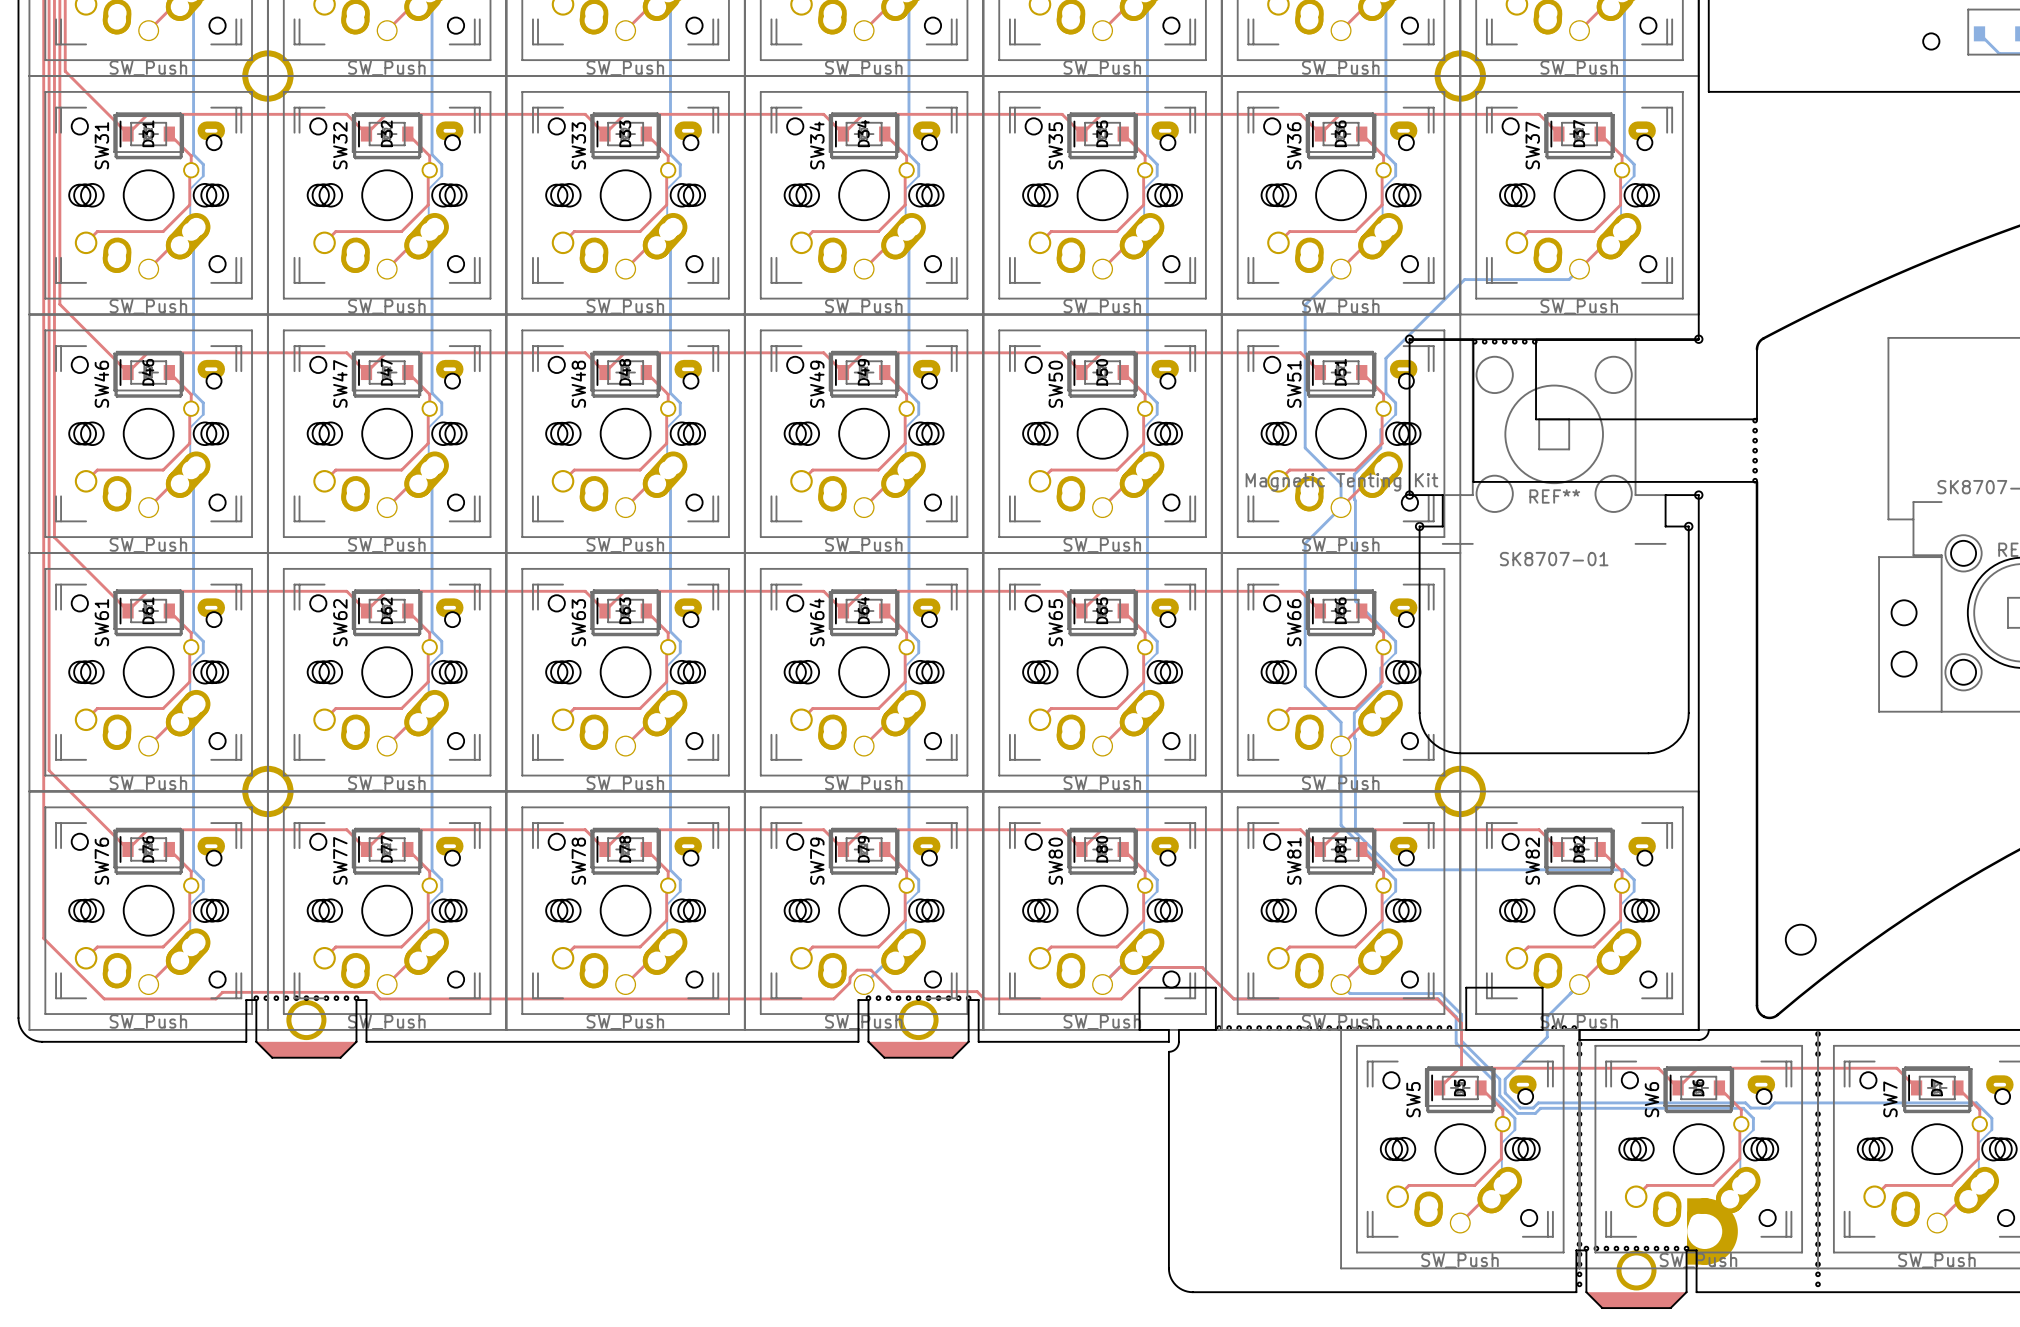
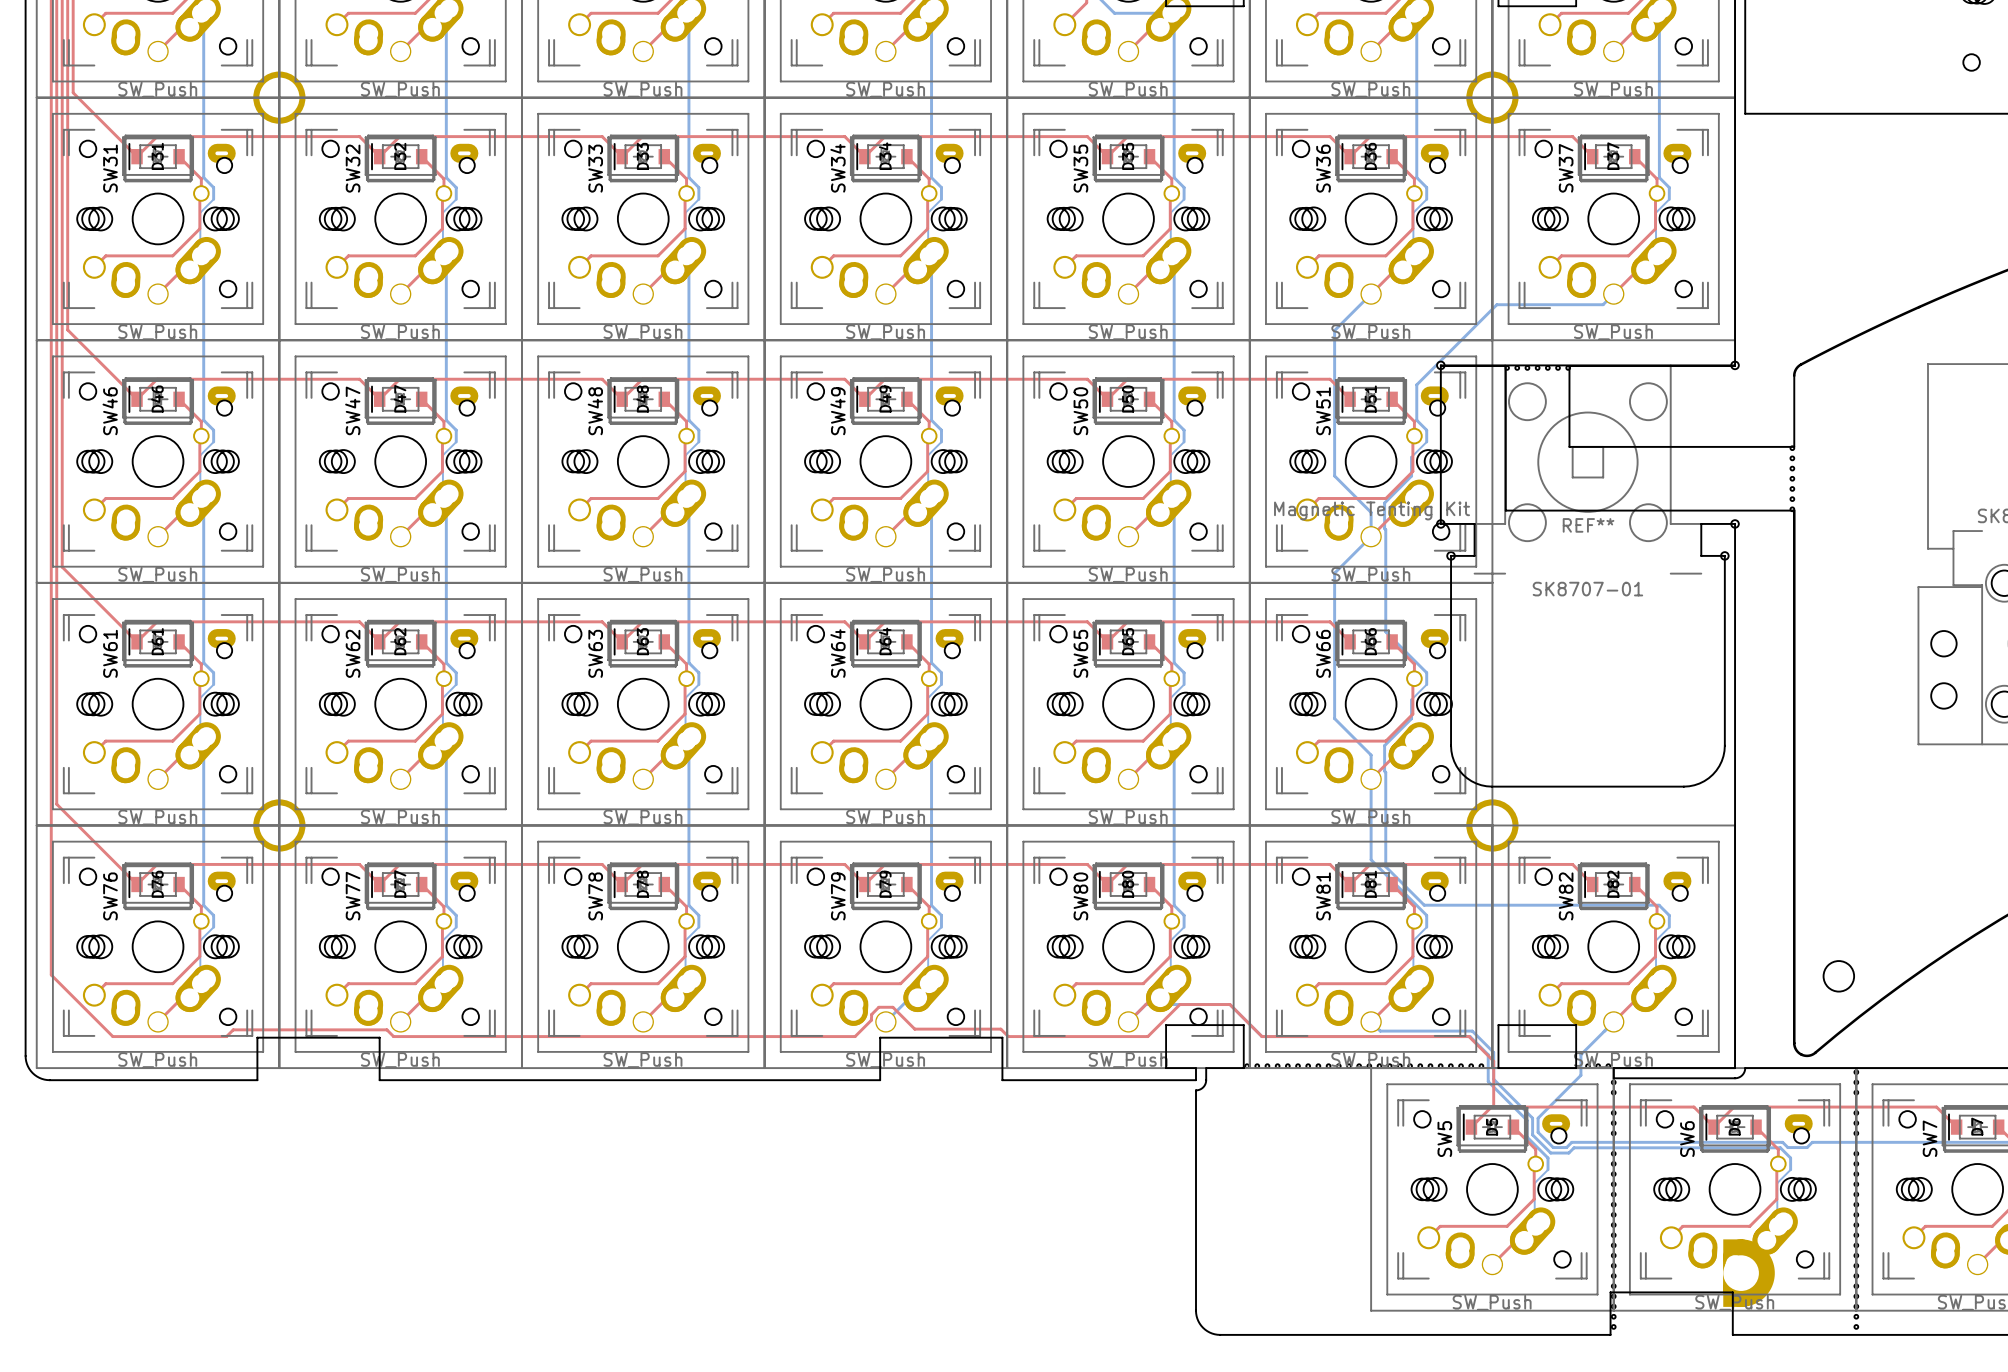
drawing: none -> [256, 1036, 381, 1082]
drawing: none -> [879, 1036, 1004, 1082]
part: (306, 1027) -> none
part: (918, 1027) -> none
drawing: none -> [1609, 1291, 1734, 1336]
part: (1636, 1277) -> none

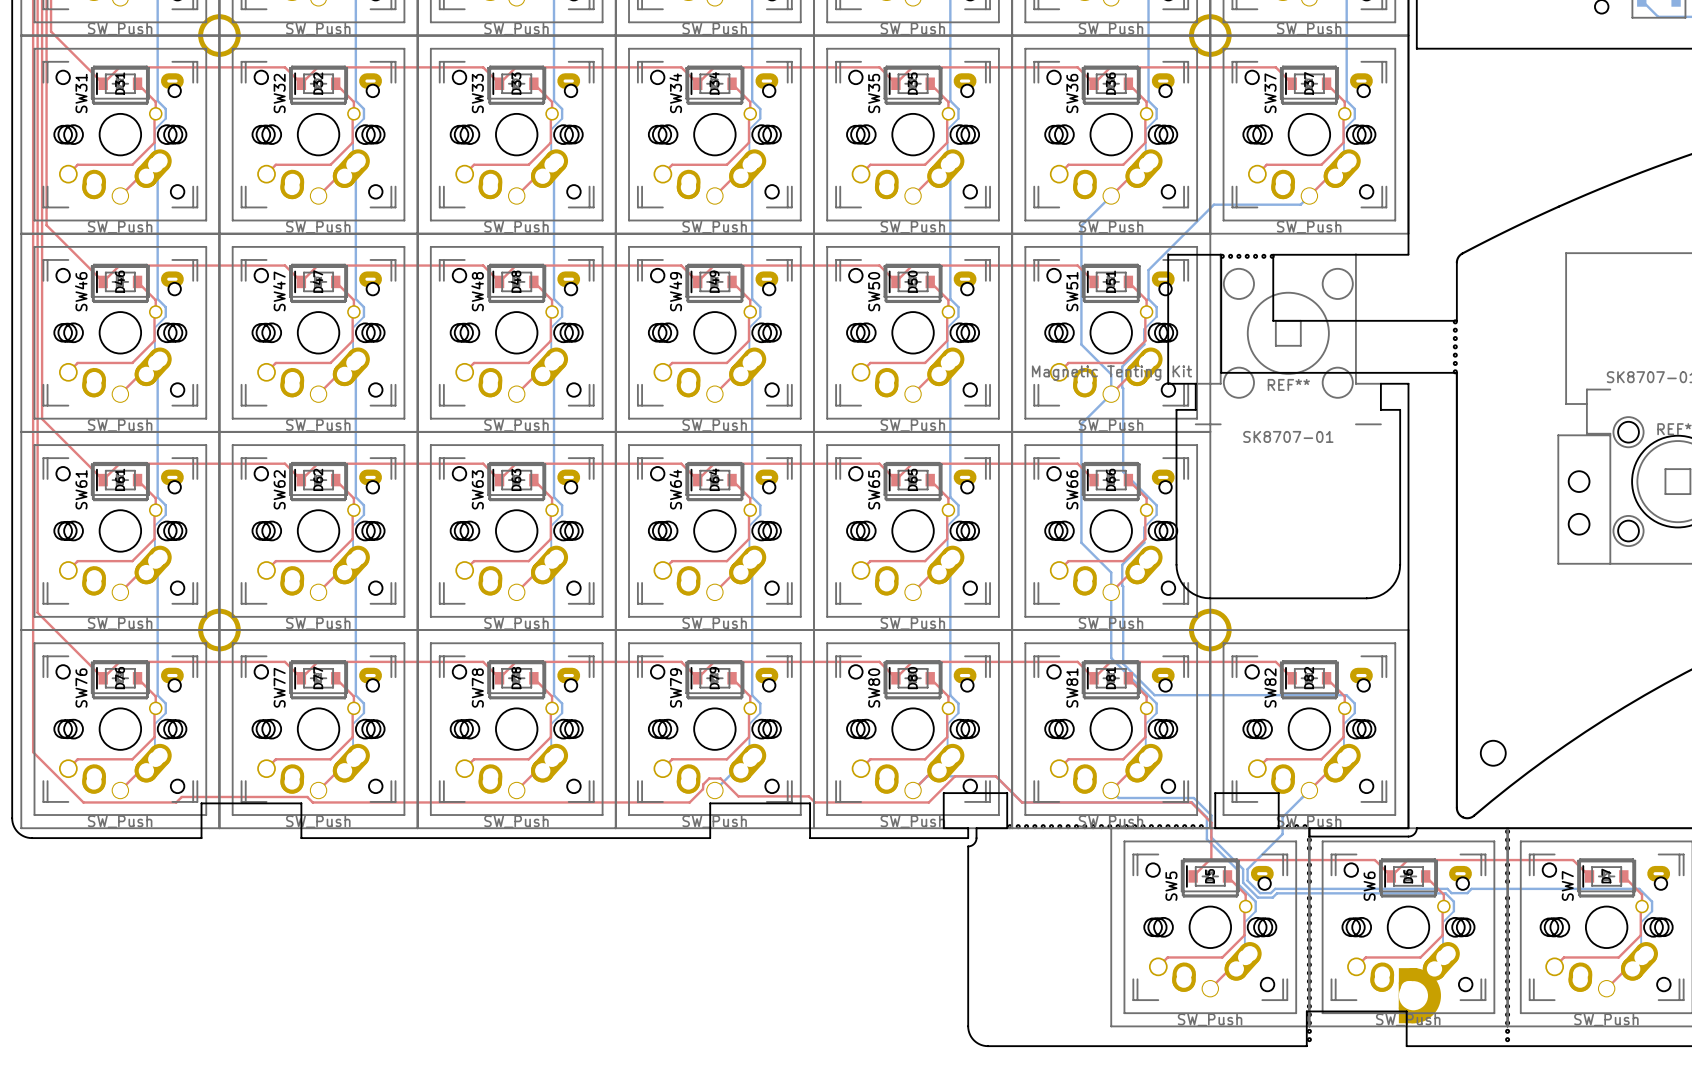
REF** footprint: [1437, 361, 1739, 788] -> [1167, 253, 1410, 600]

